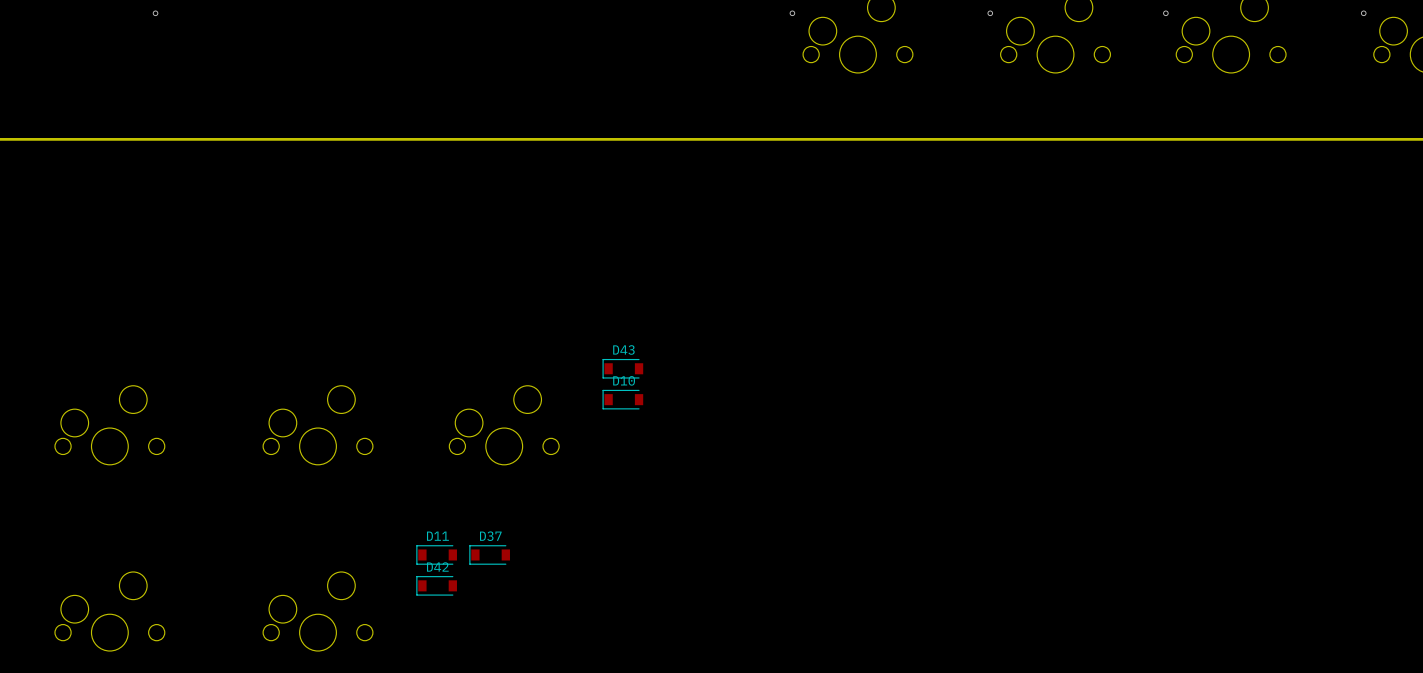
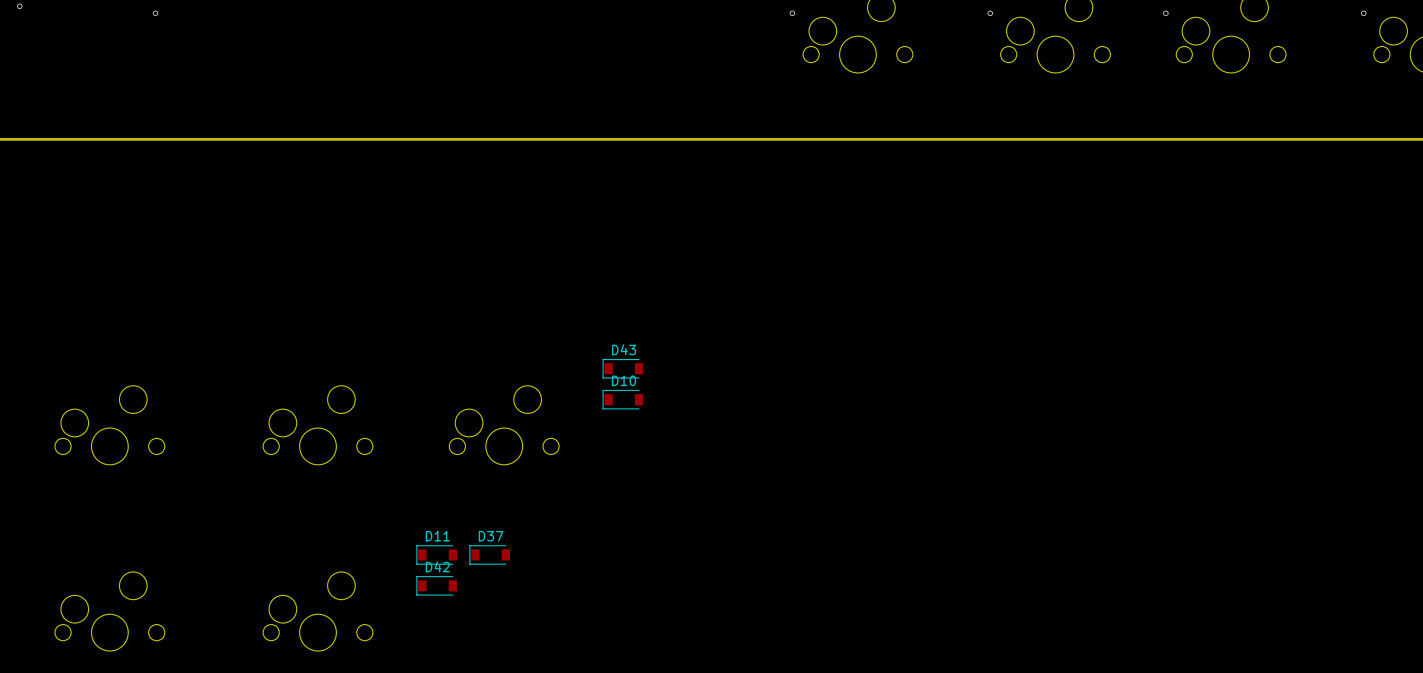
via: none -> (19, 6)

